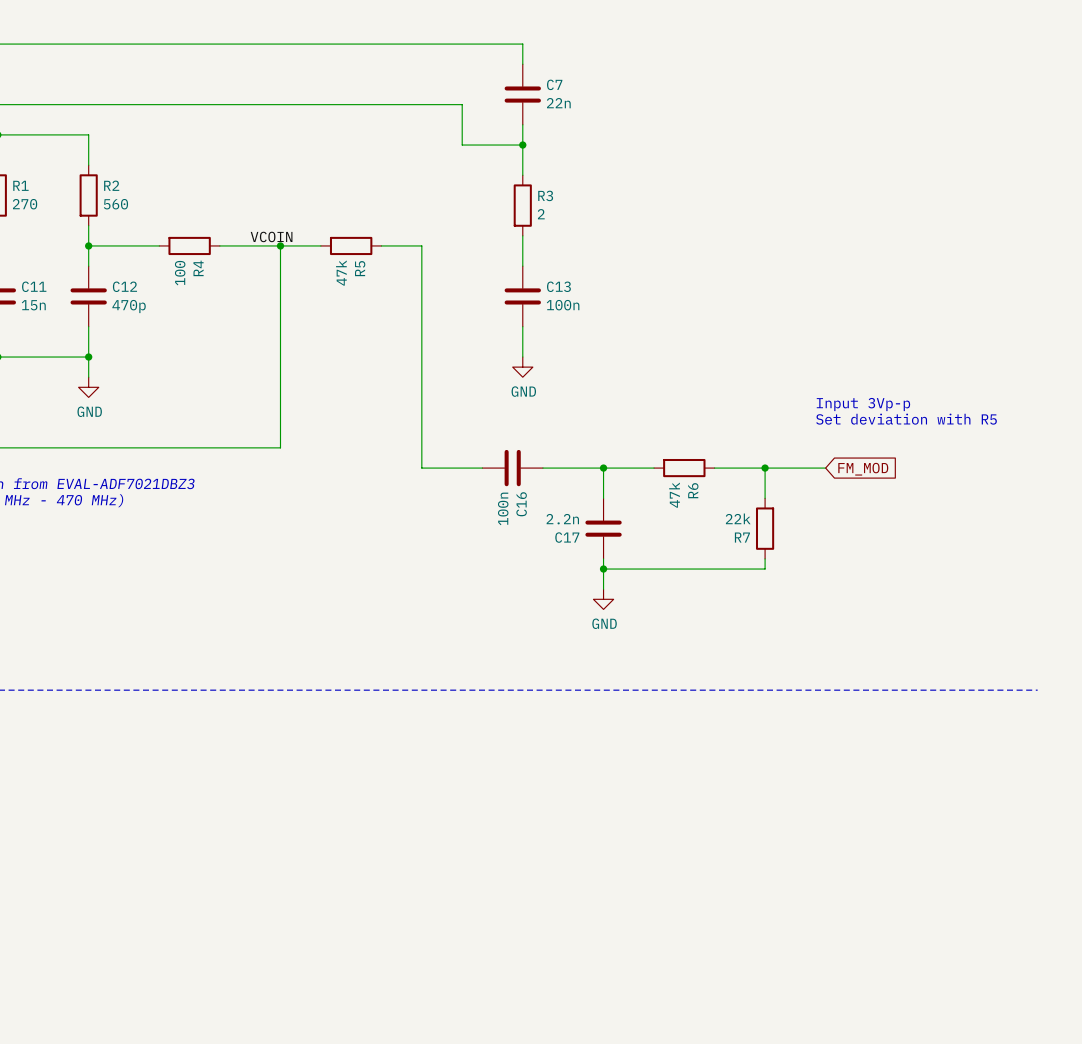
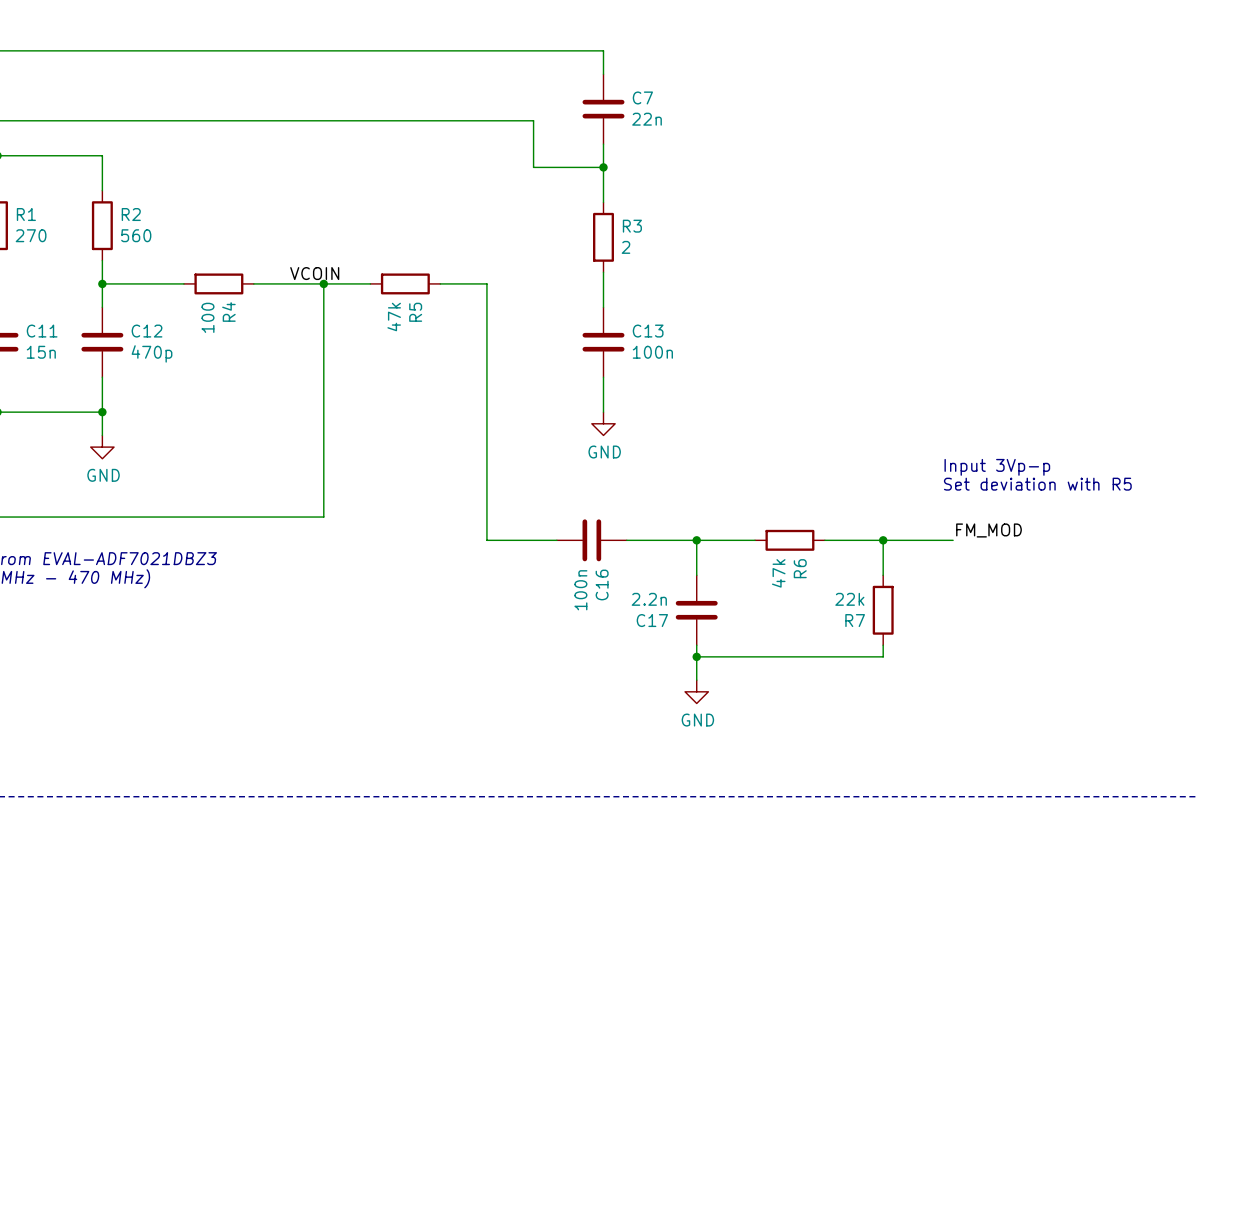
label: none -> FM_MOD (988, 530)
global label: FM_MOD (863, 469) -> none

